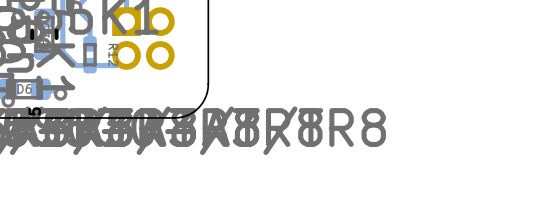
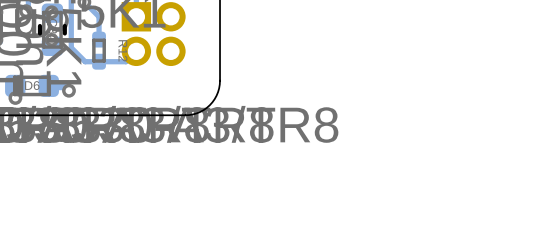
text: 5 (34, 111) -> none

